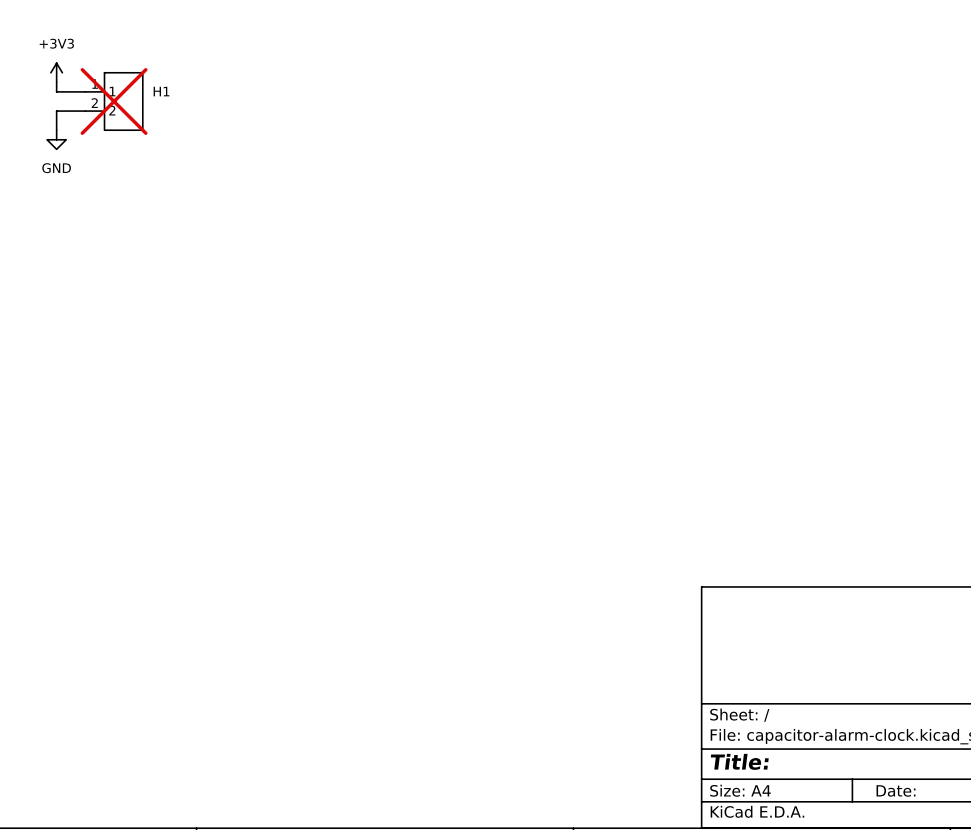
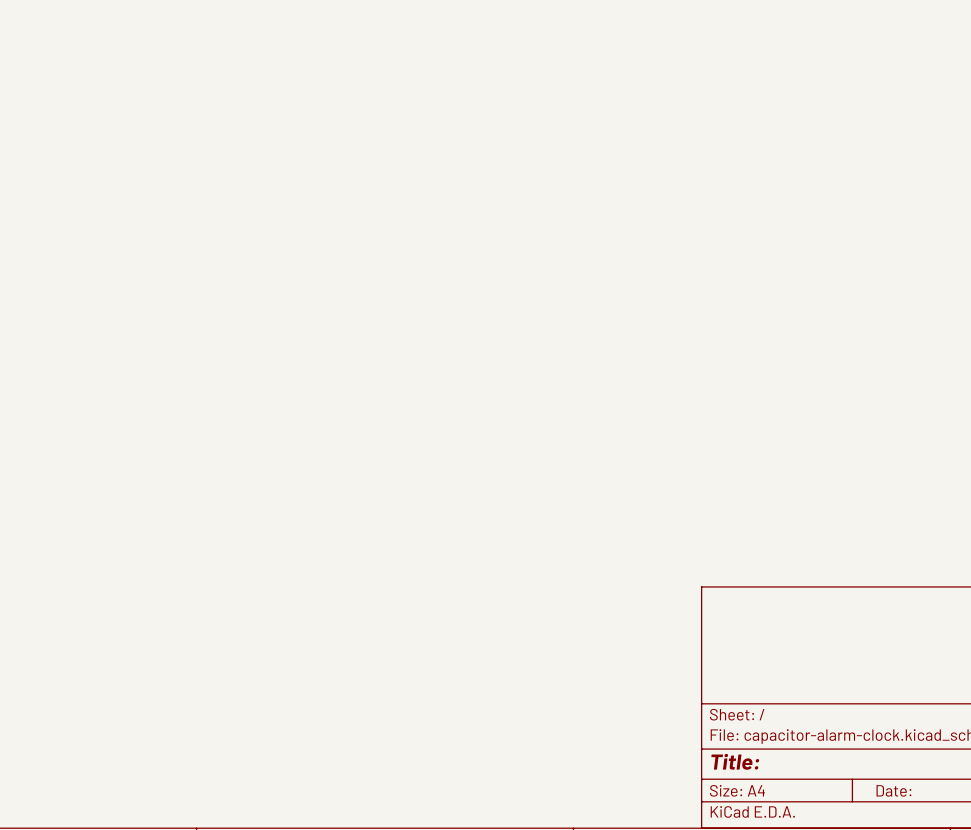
power symbol: +3V3 (56, 72) -> none
wire: (56, 82) (56, 91) (85, 91) -> none
H1: (114, 101) -> none
wire: (85, 111) (56, 111) (56, 130) -> none
power symbol: GND (56, 139) -> none

